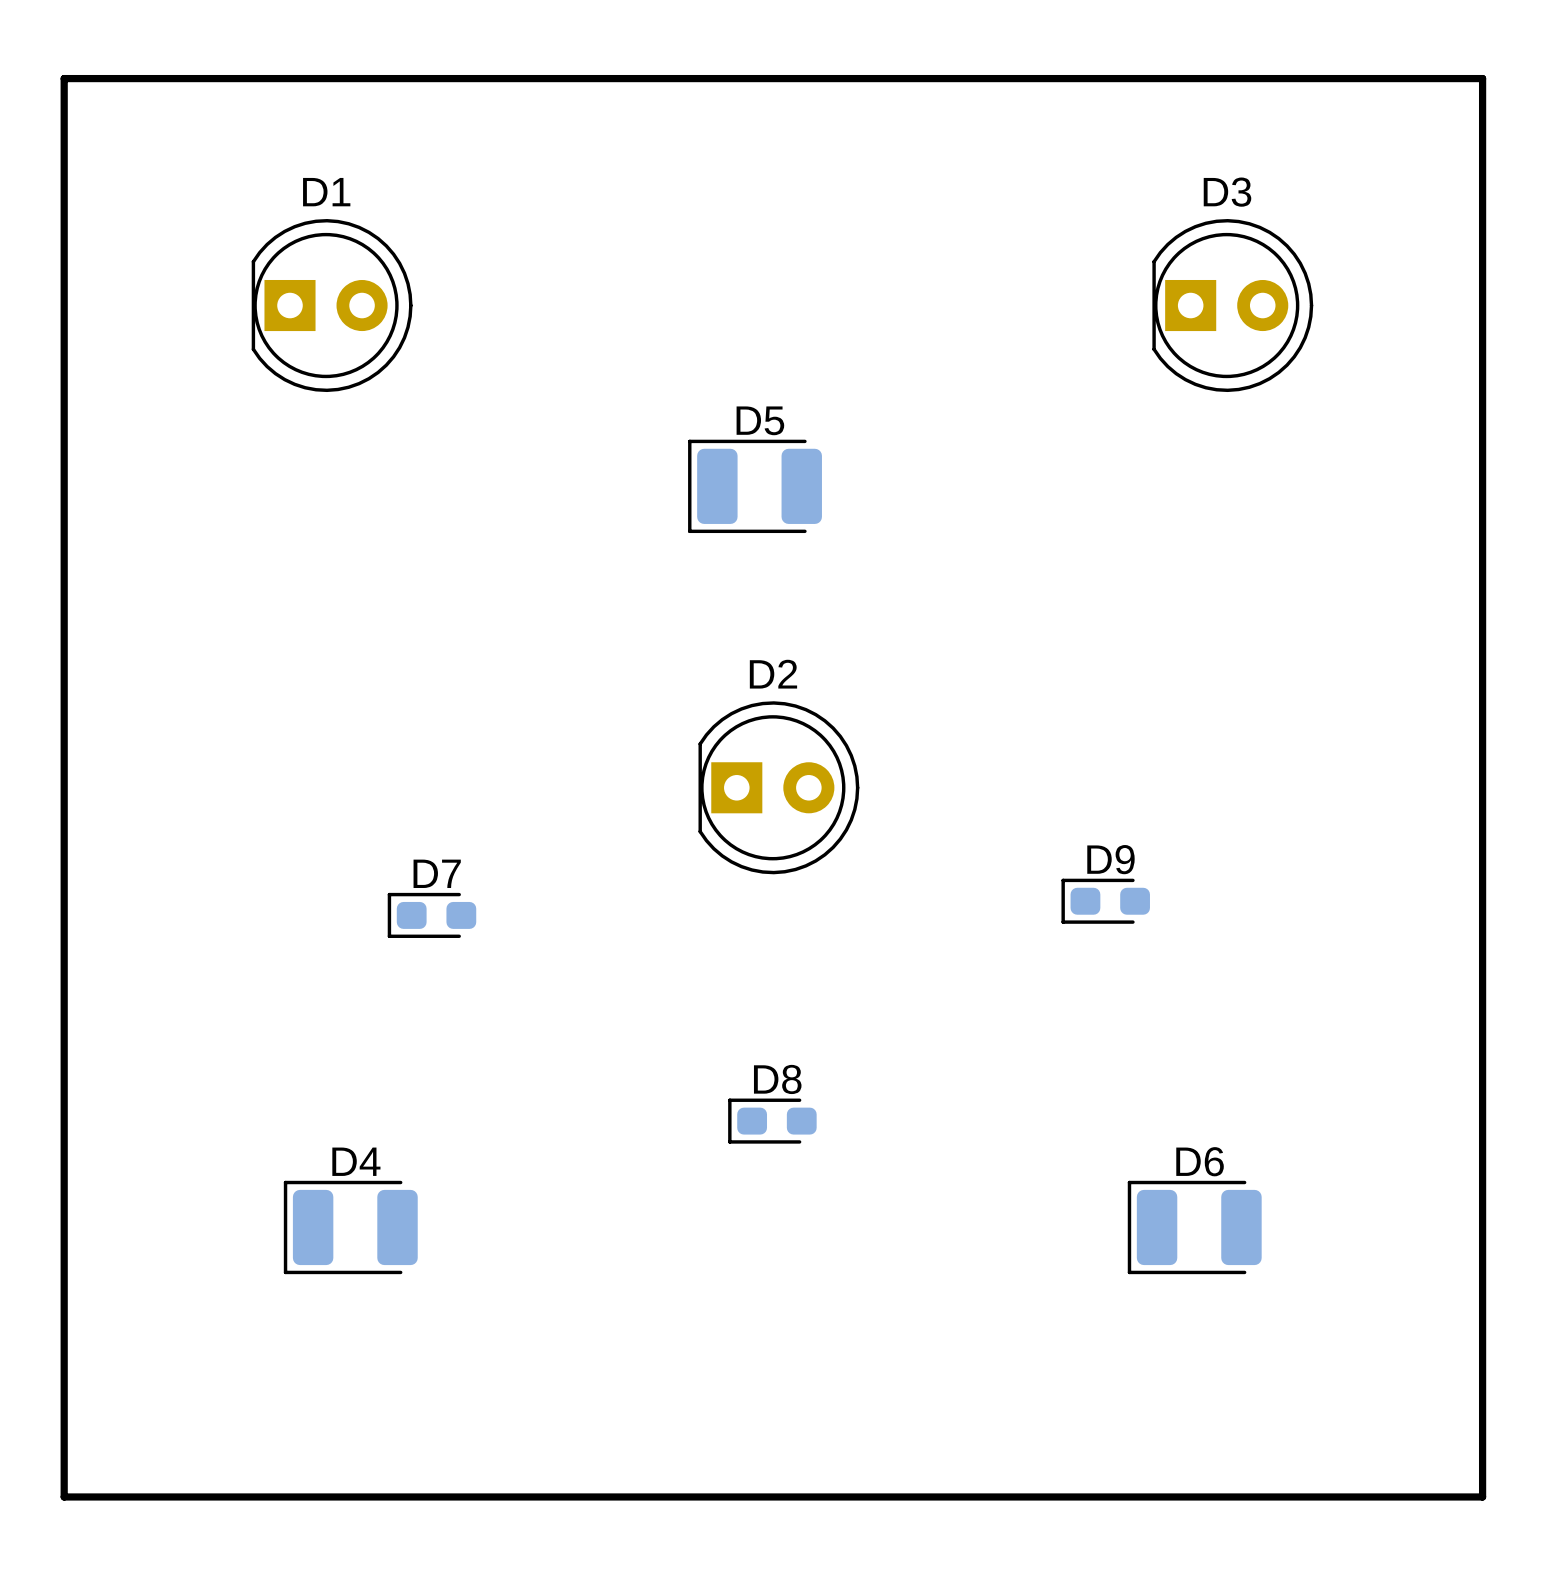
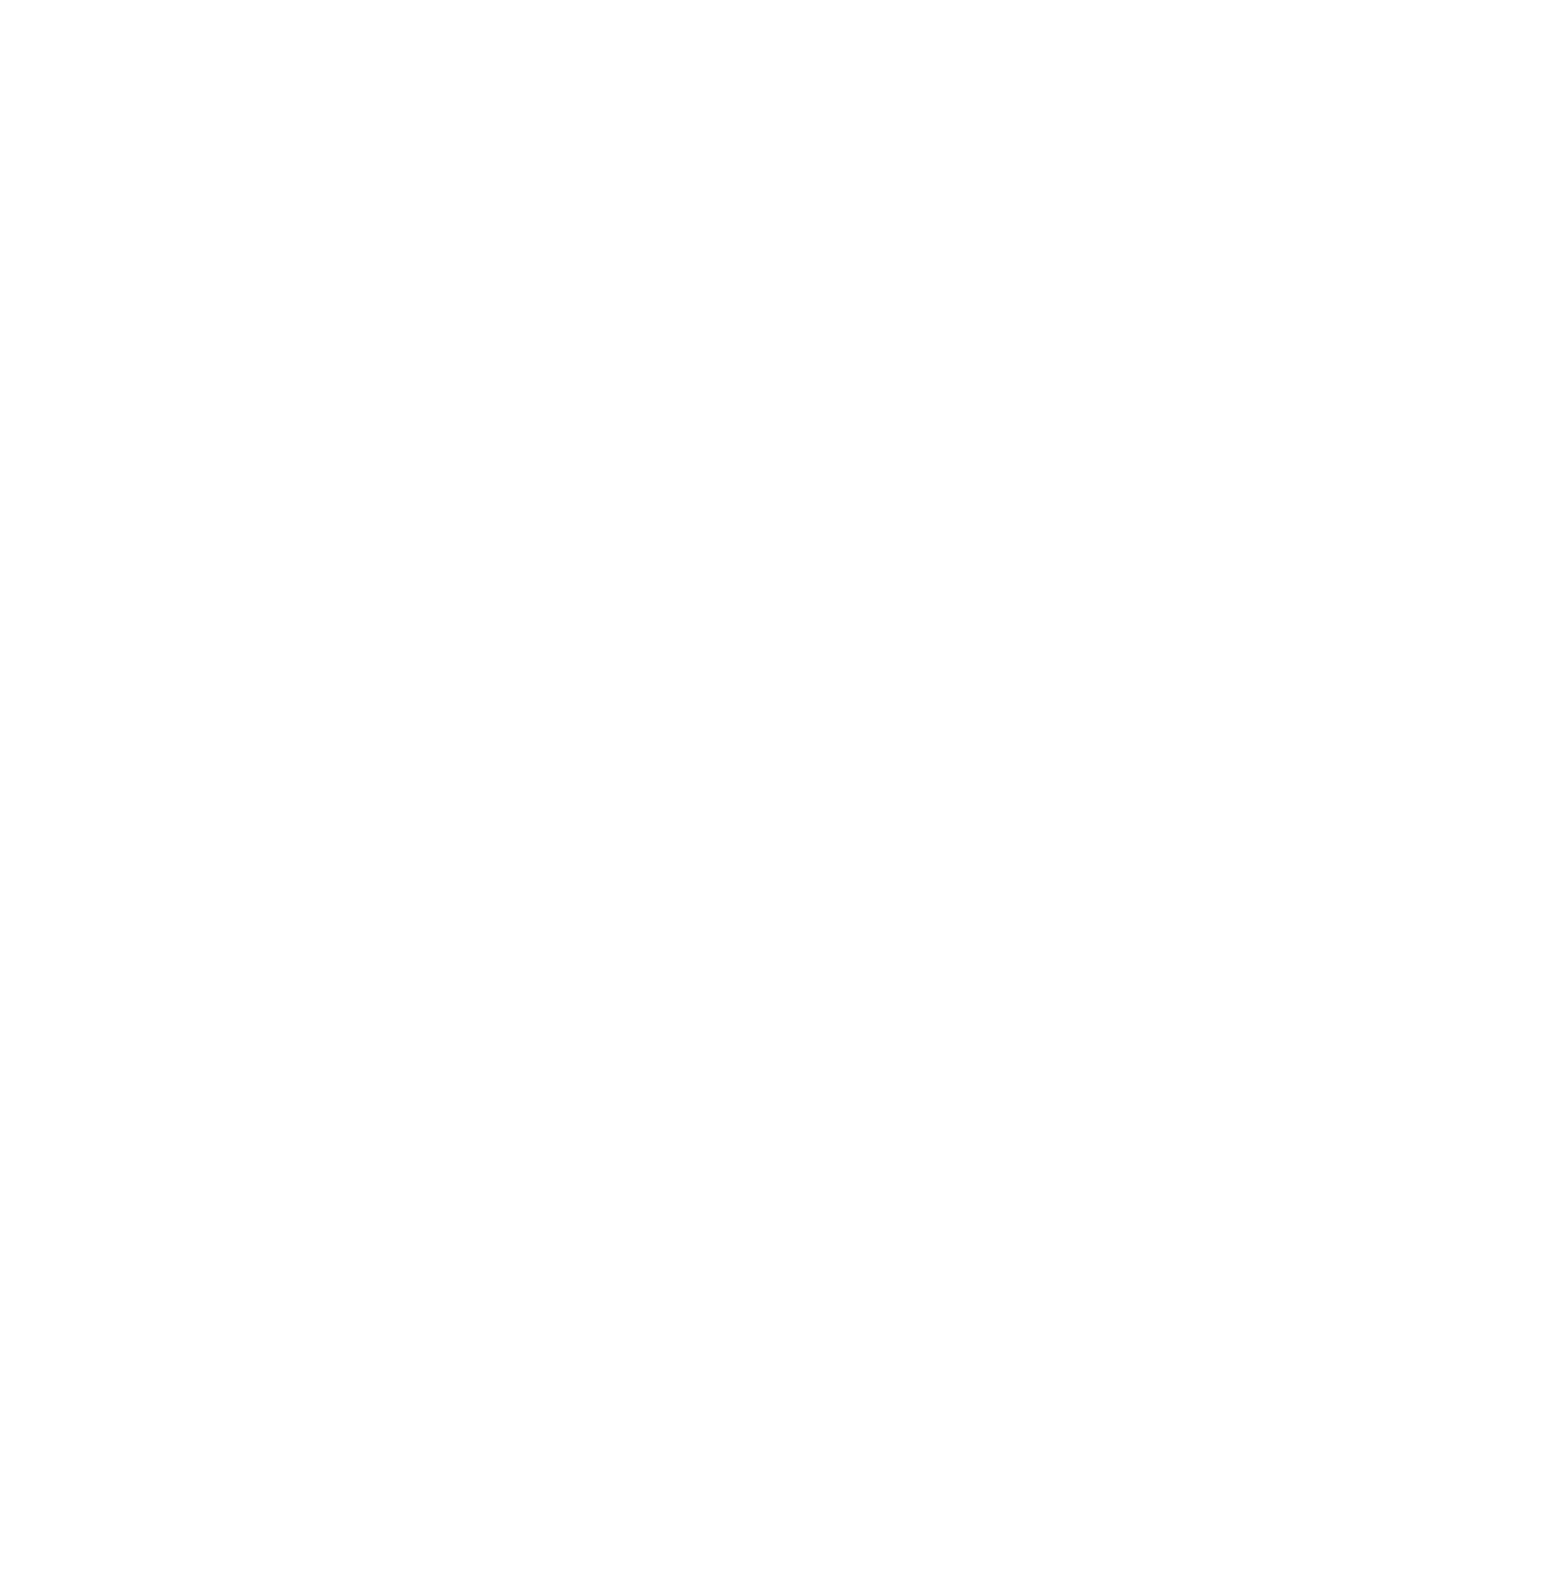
board edge: (1482, 78) (64, 78) (64, 1496) (1482, 1496) (1482, 78) -> none
D1: (332, 305) -> none
D3: (1232, 305) -> none
D5: (755, 486) -> none
D2: (778, 787) -> none
D9: (1105, 901) -> none
D7: (431, 915) -> none
D8: (772, 1121) -> none
D4: (350, 1227) -> none
D6: (1194, 1227) -> none

